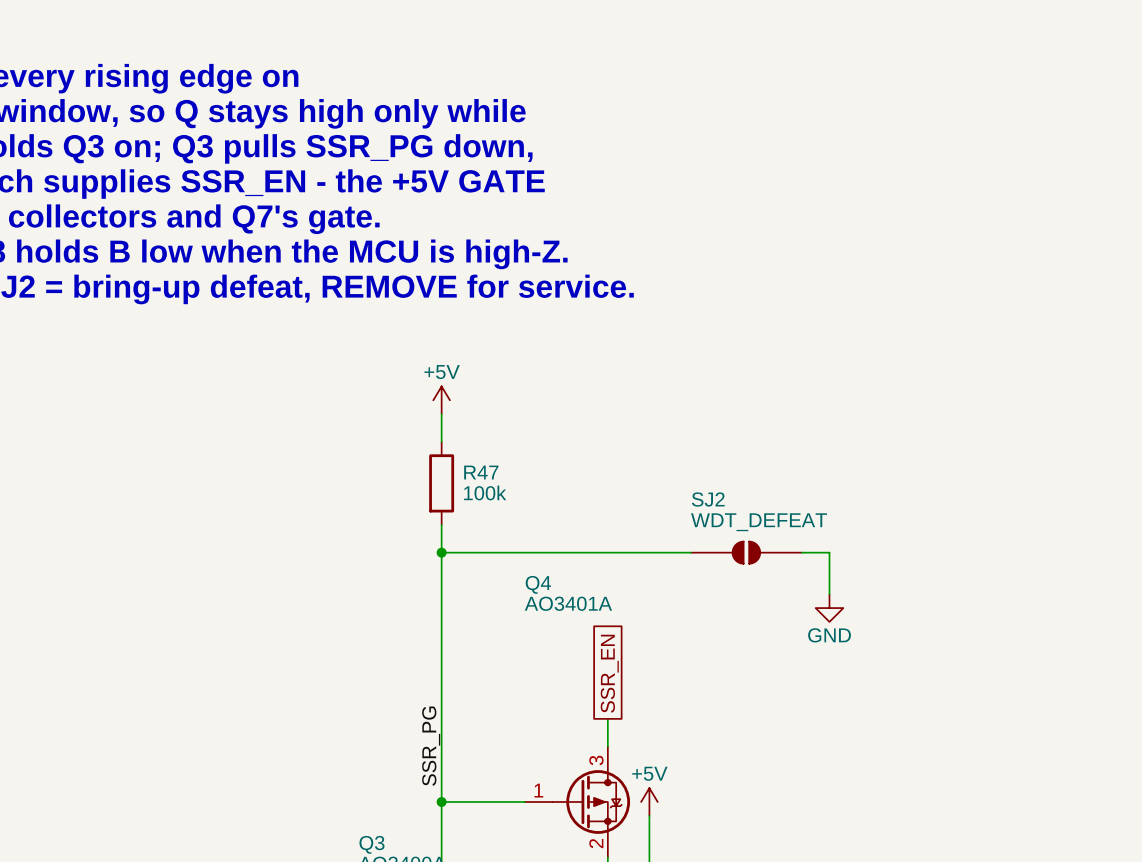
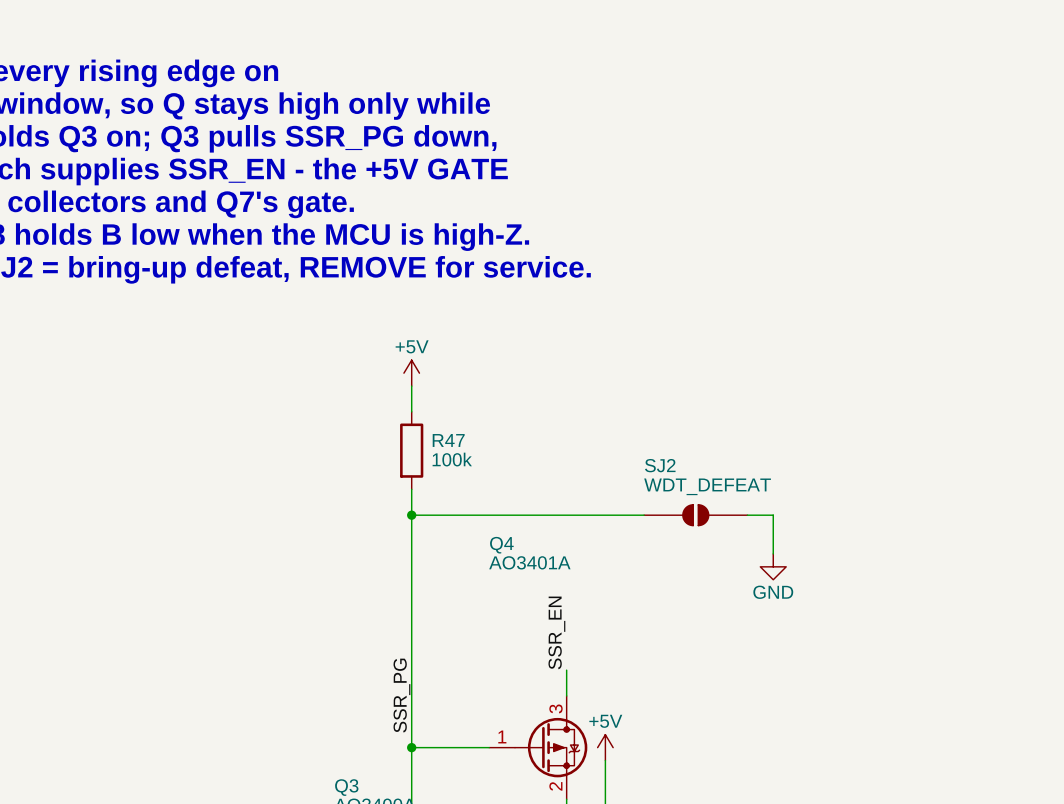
global label: SSR_EN (609, 673) -> none
label: none -> SSR_EN (556, 632)

